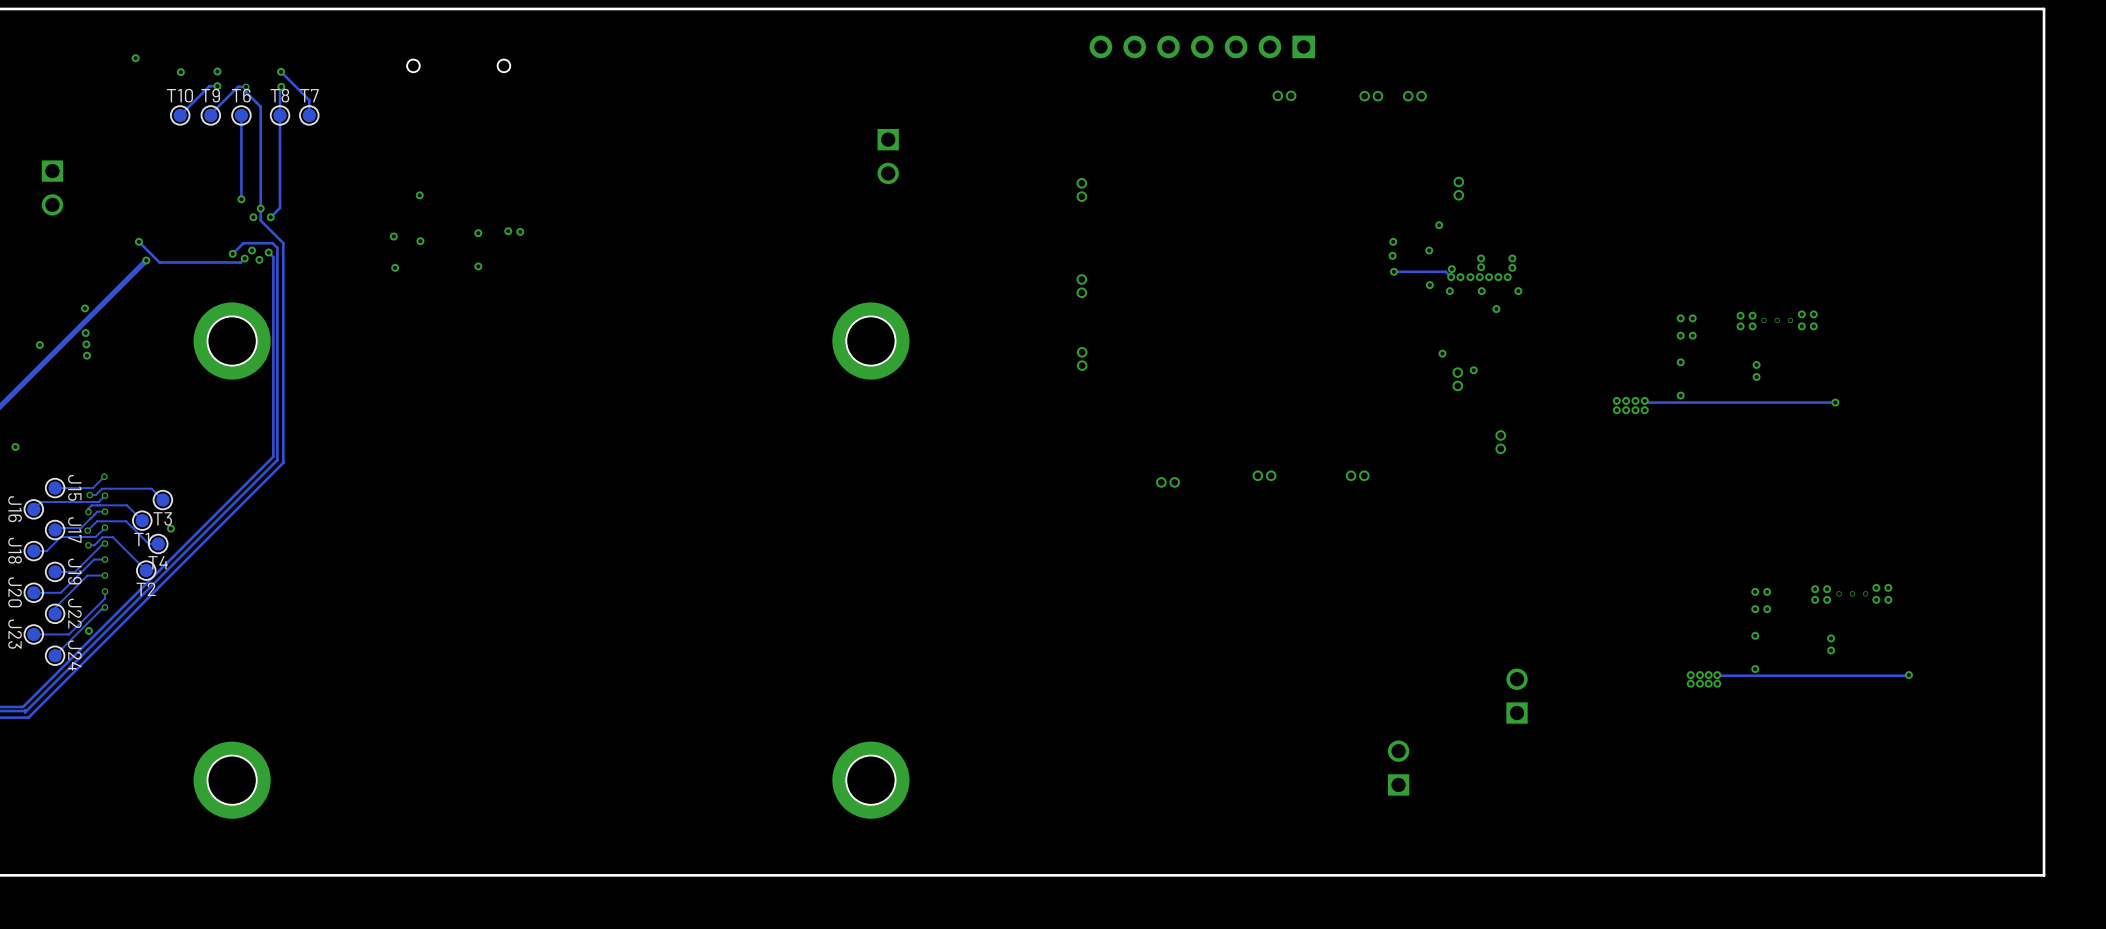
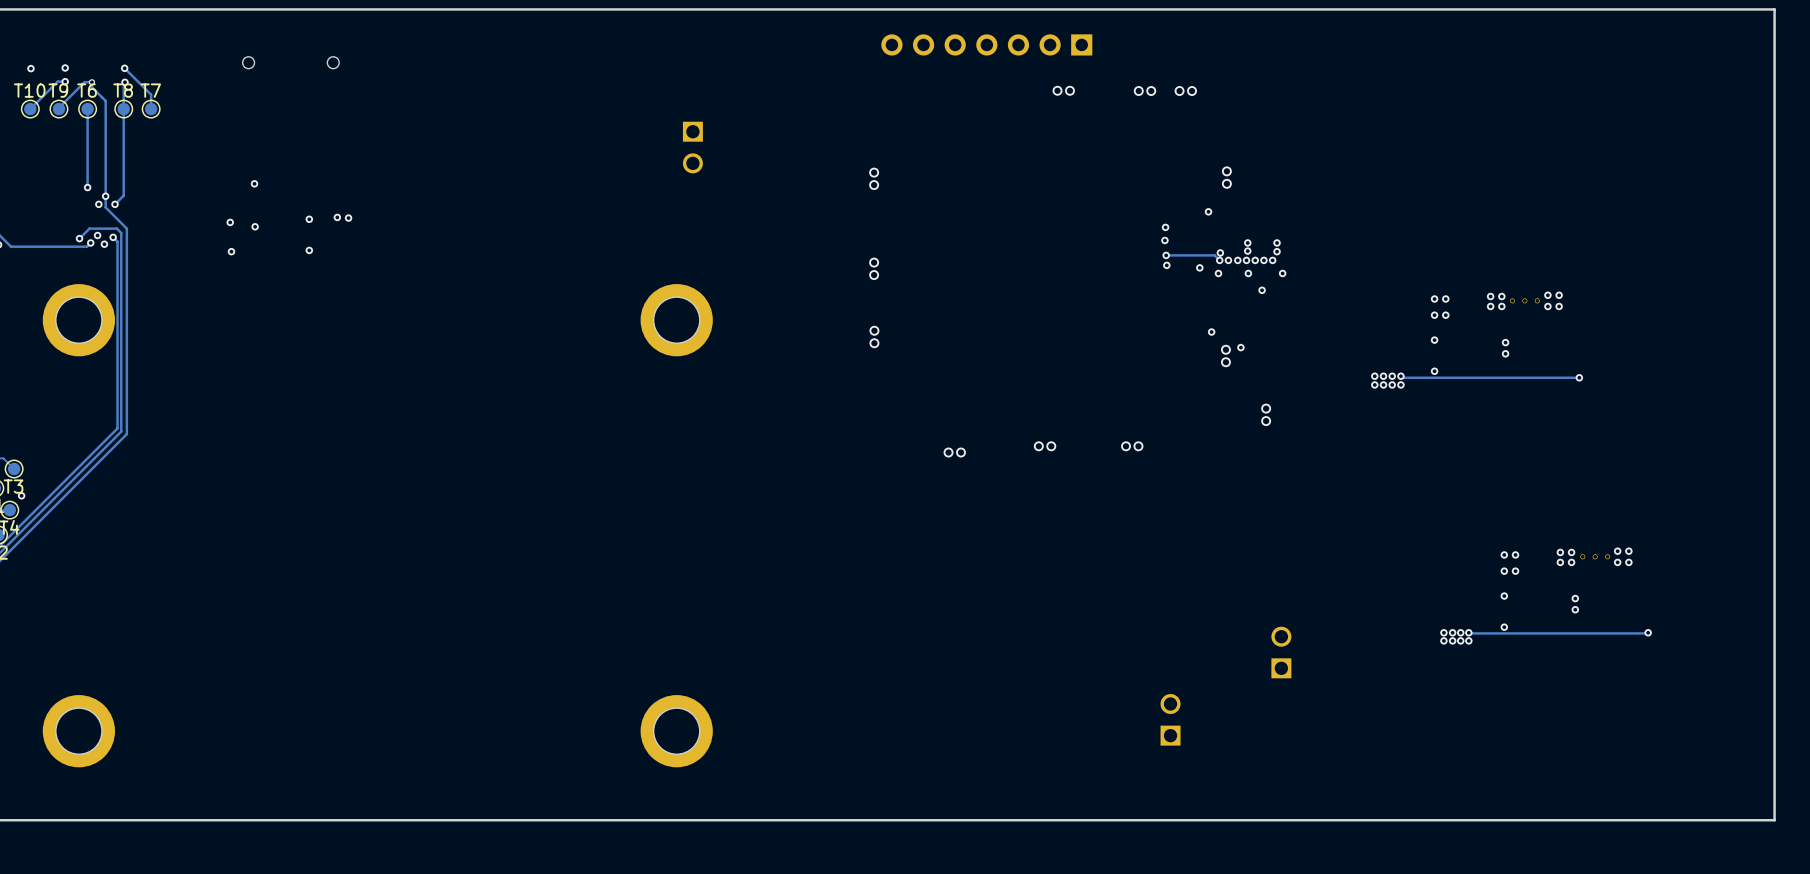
via position: (1429, 250) -> (1166, 265)

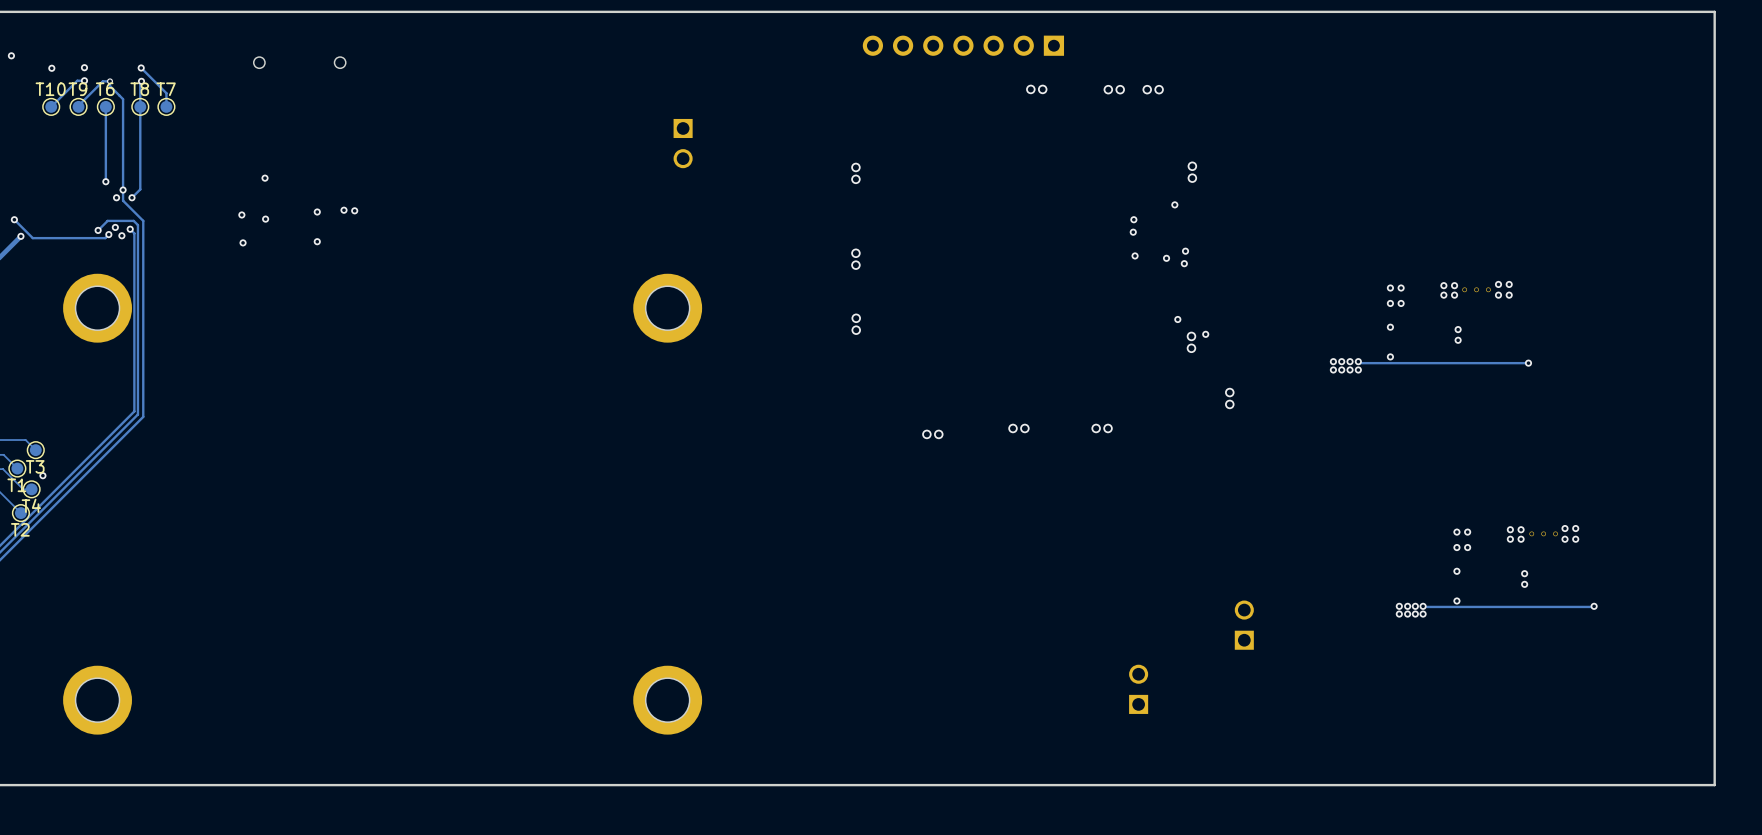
via: (1247, 242) -> none
via: (1277, 242) -> none
via: (1247, 251) -> none
via: (1277, 251) -> none
via: (1220, 252) -> none
track: (1166, 255) (1214, 255) (1219, 260) -> none
via: (1166, 255) -> none
via: (1228, 260) -> none
via: (1237, 260) -> none
via: (1246, 260) -> none
via: (1255, 260) -> none
via: (1263, 260) -> none
via: (1272, 260) -> none
via: (1248, 273) -> none
via: (1282, 273) -> none
via: (1262, 290) -> none

